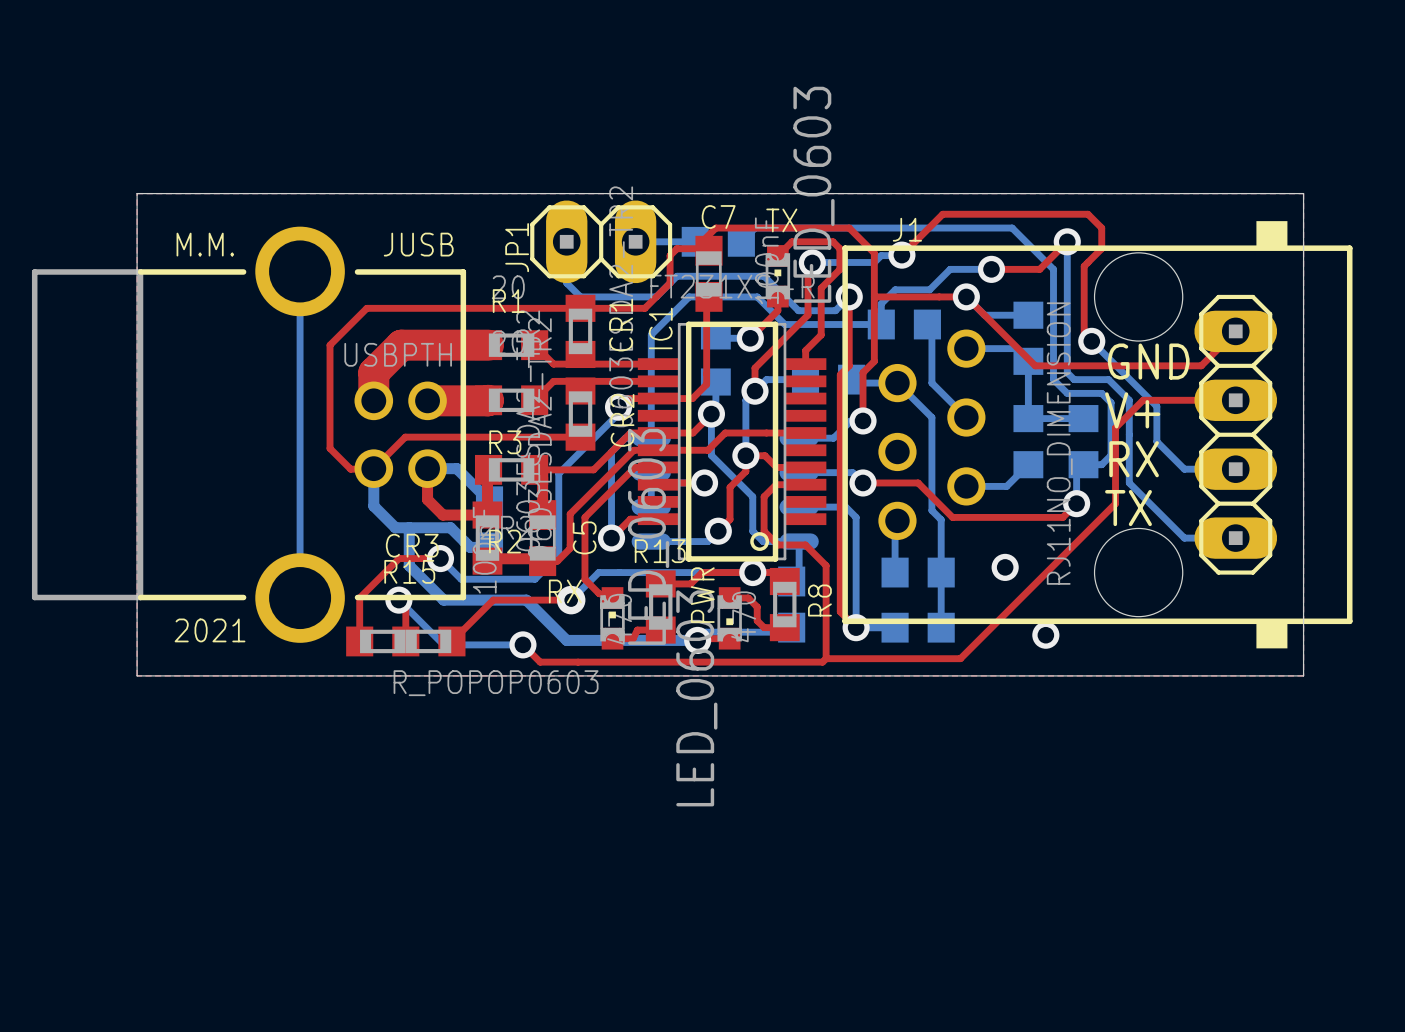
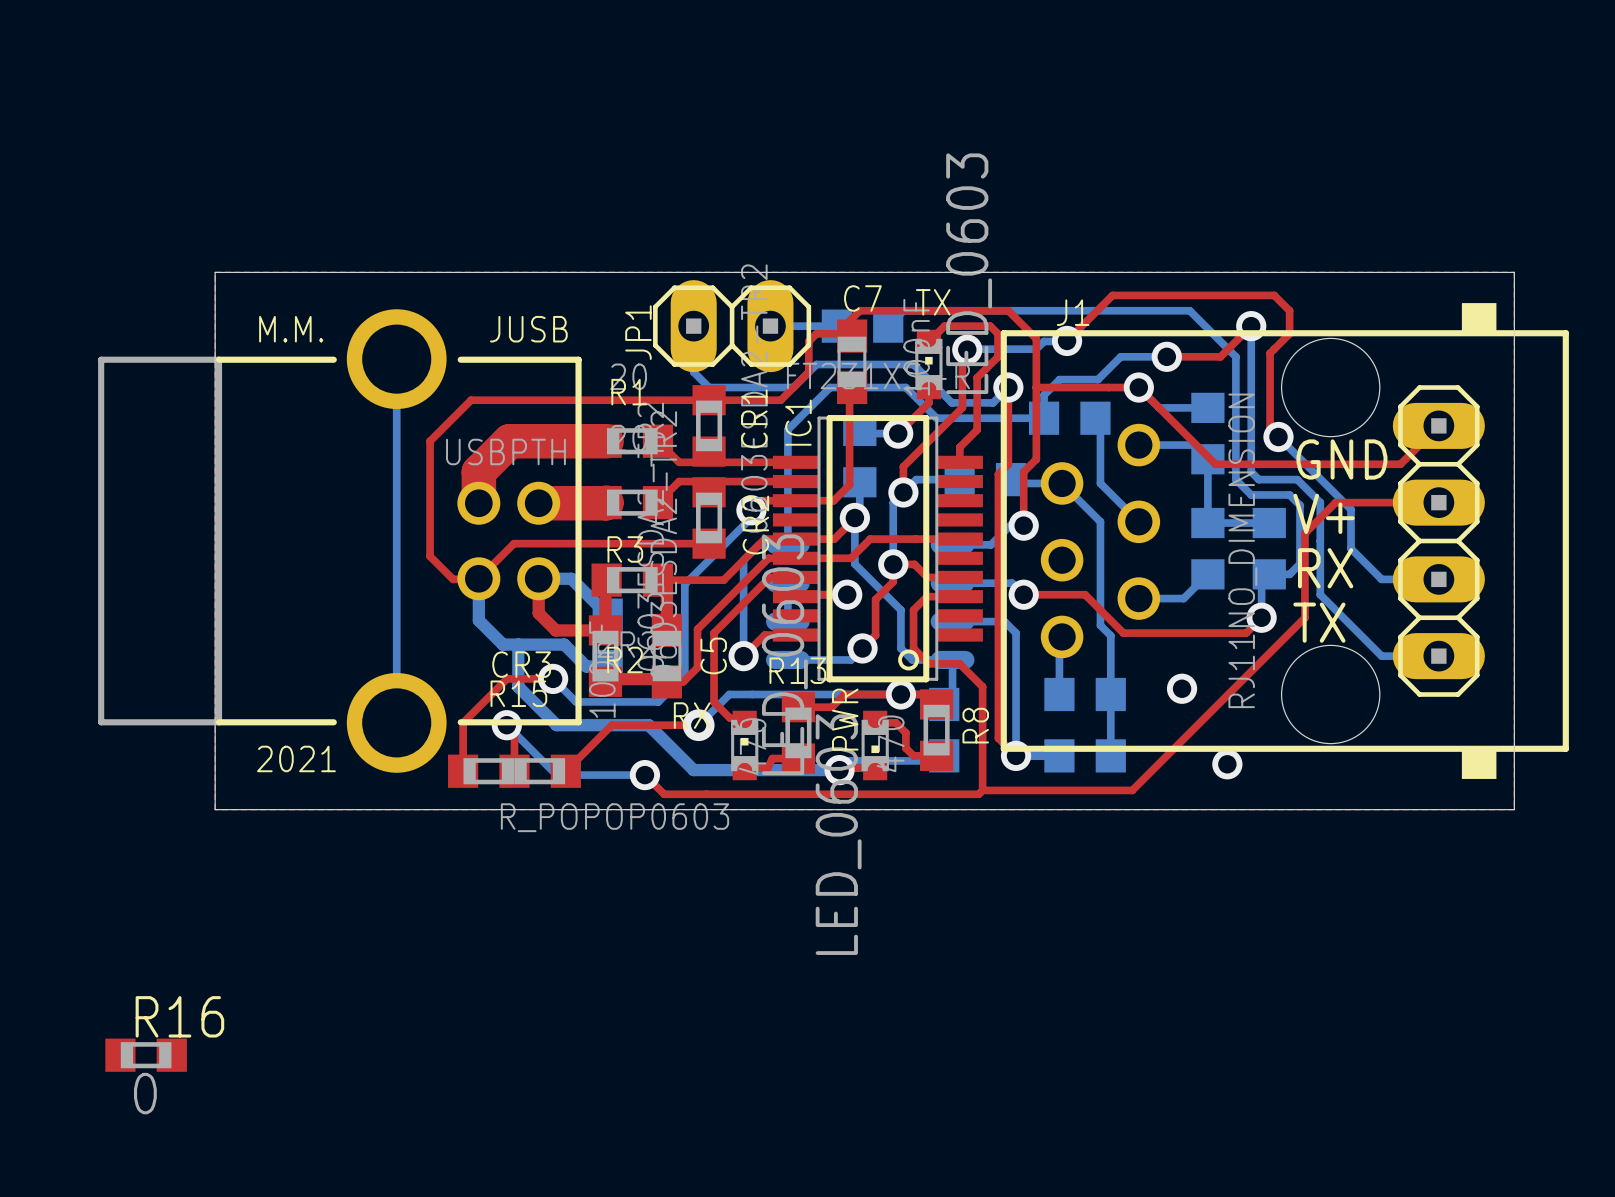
R16: none -> 0 (146, 1055)

